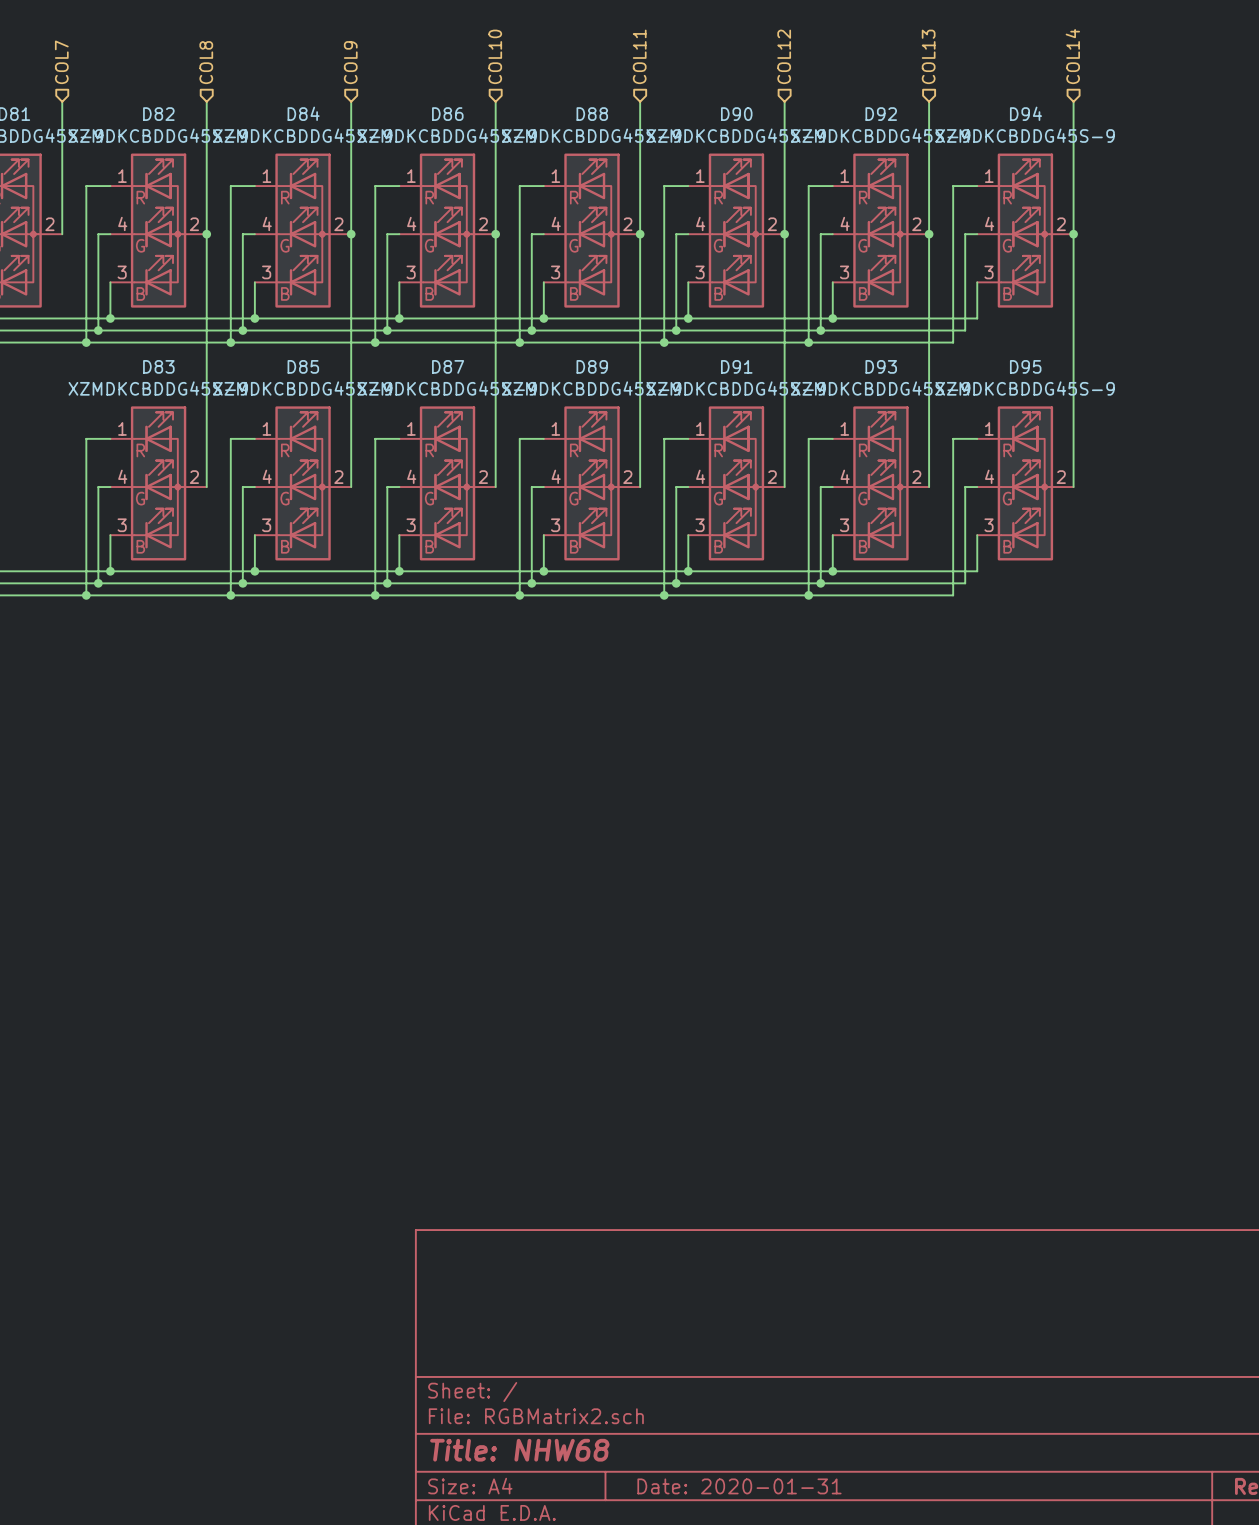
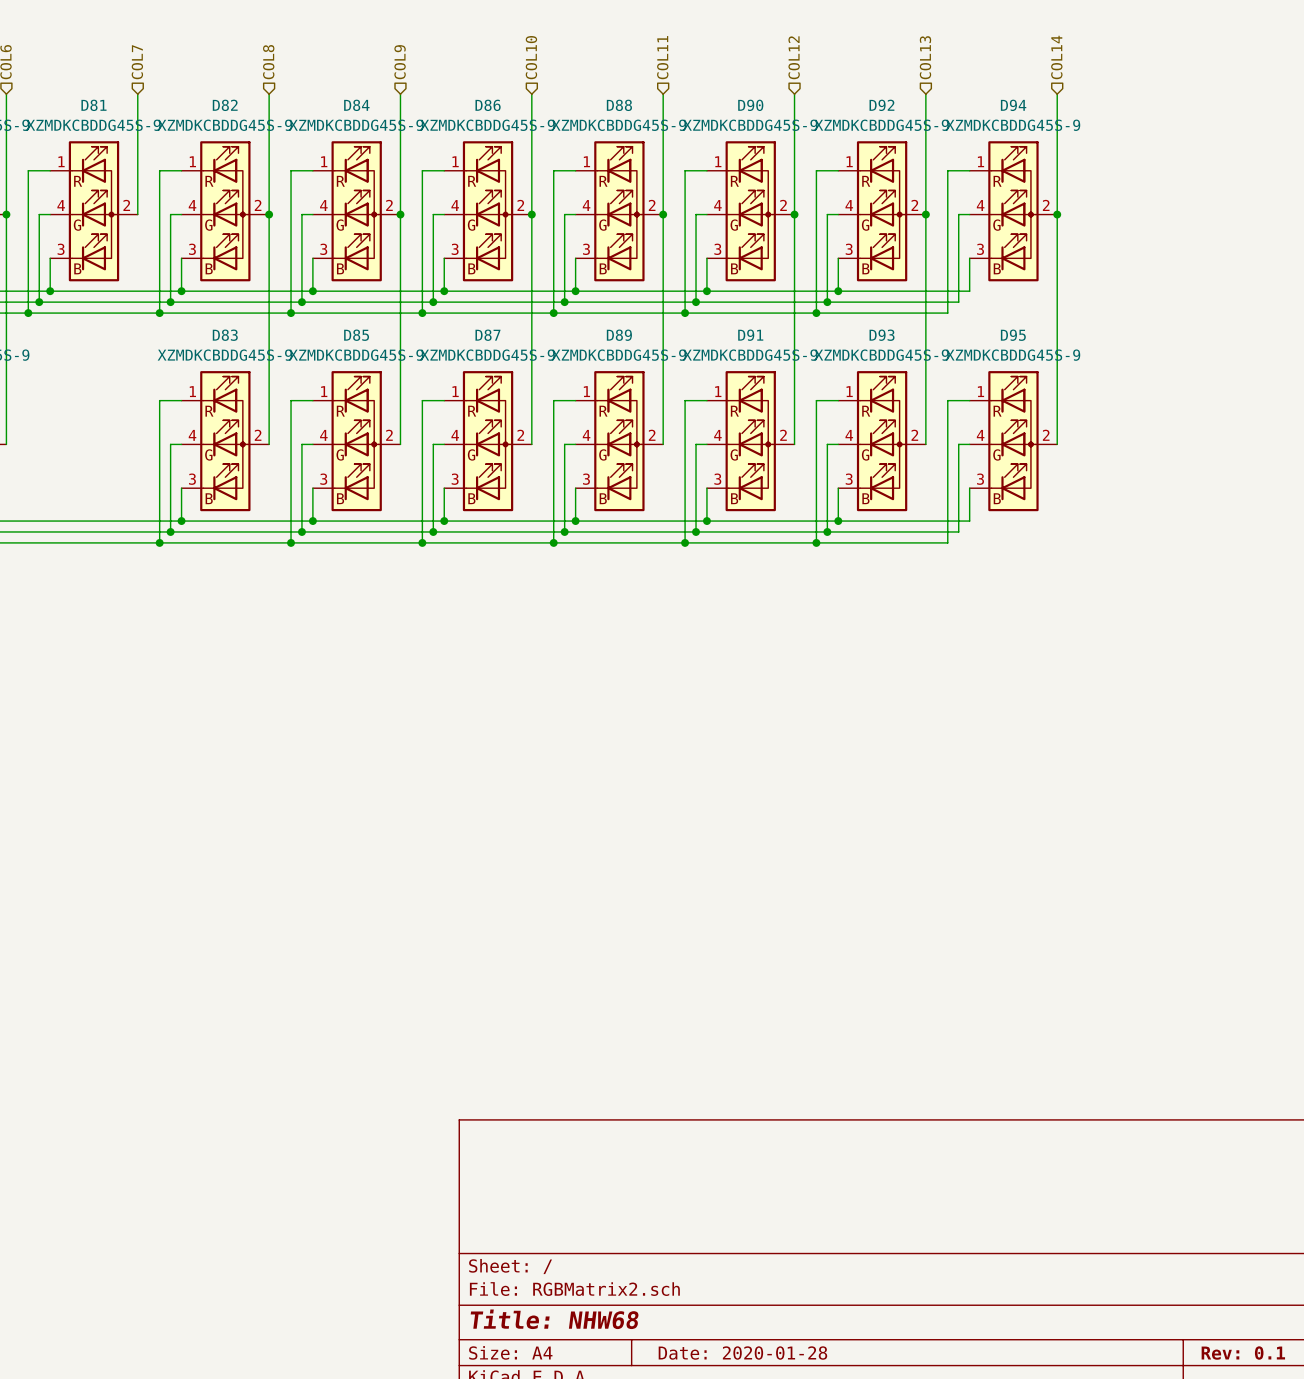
title block: Date: 2020-01-31 (739, 1486) -> Date: 2020-01-28 (742, 1353)

